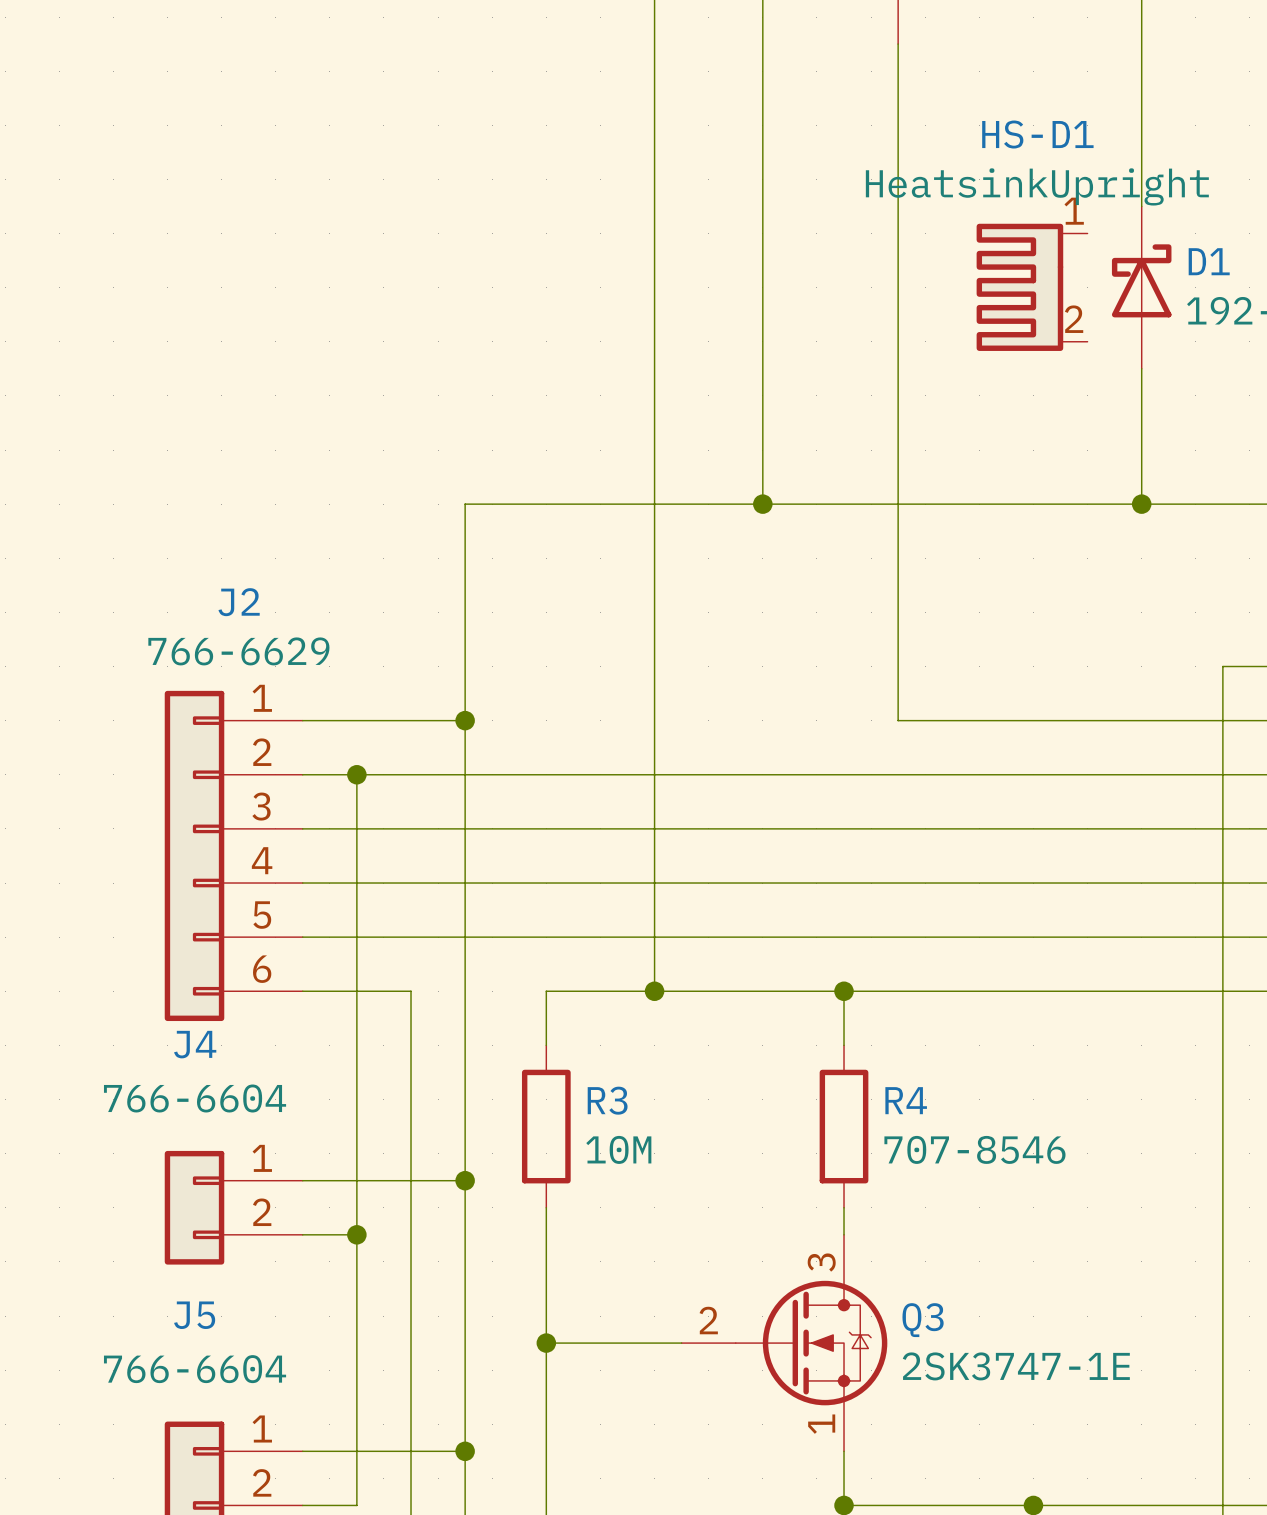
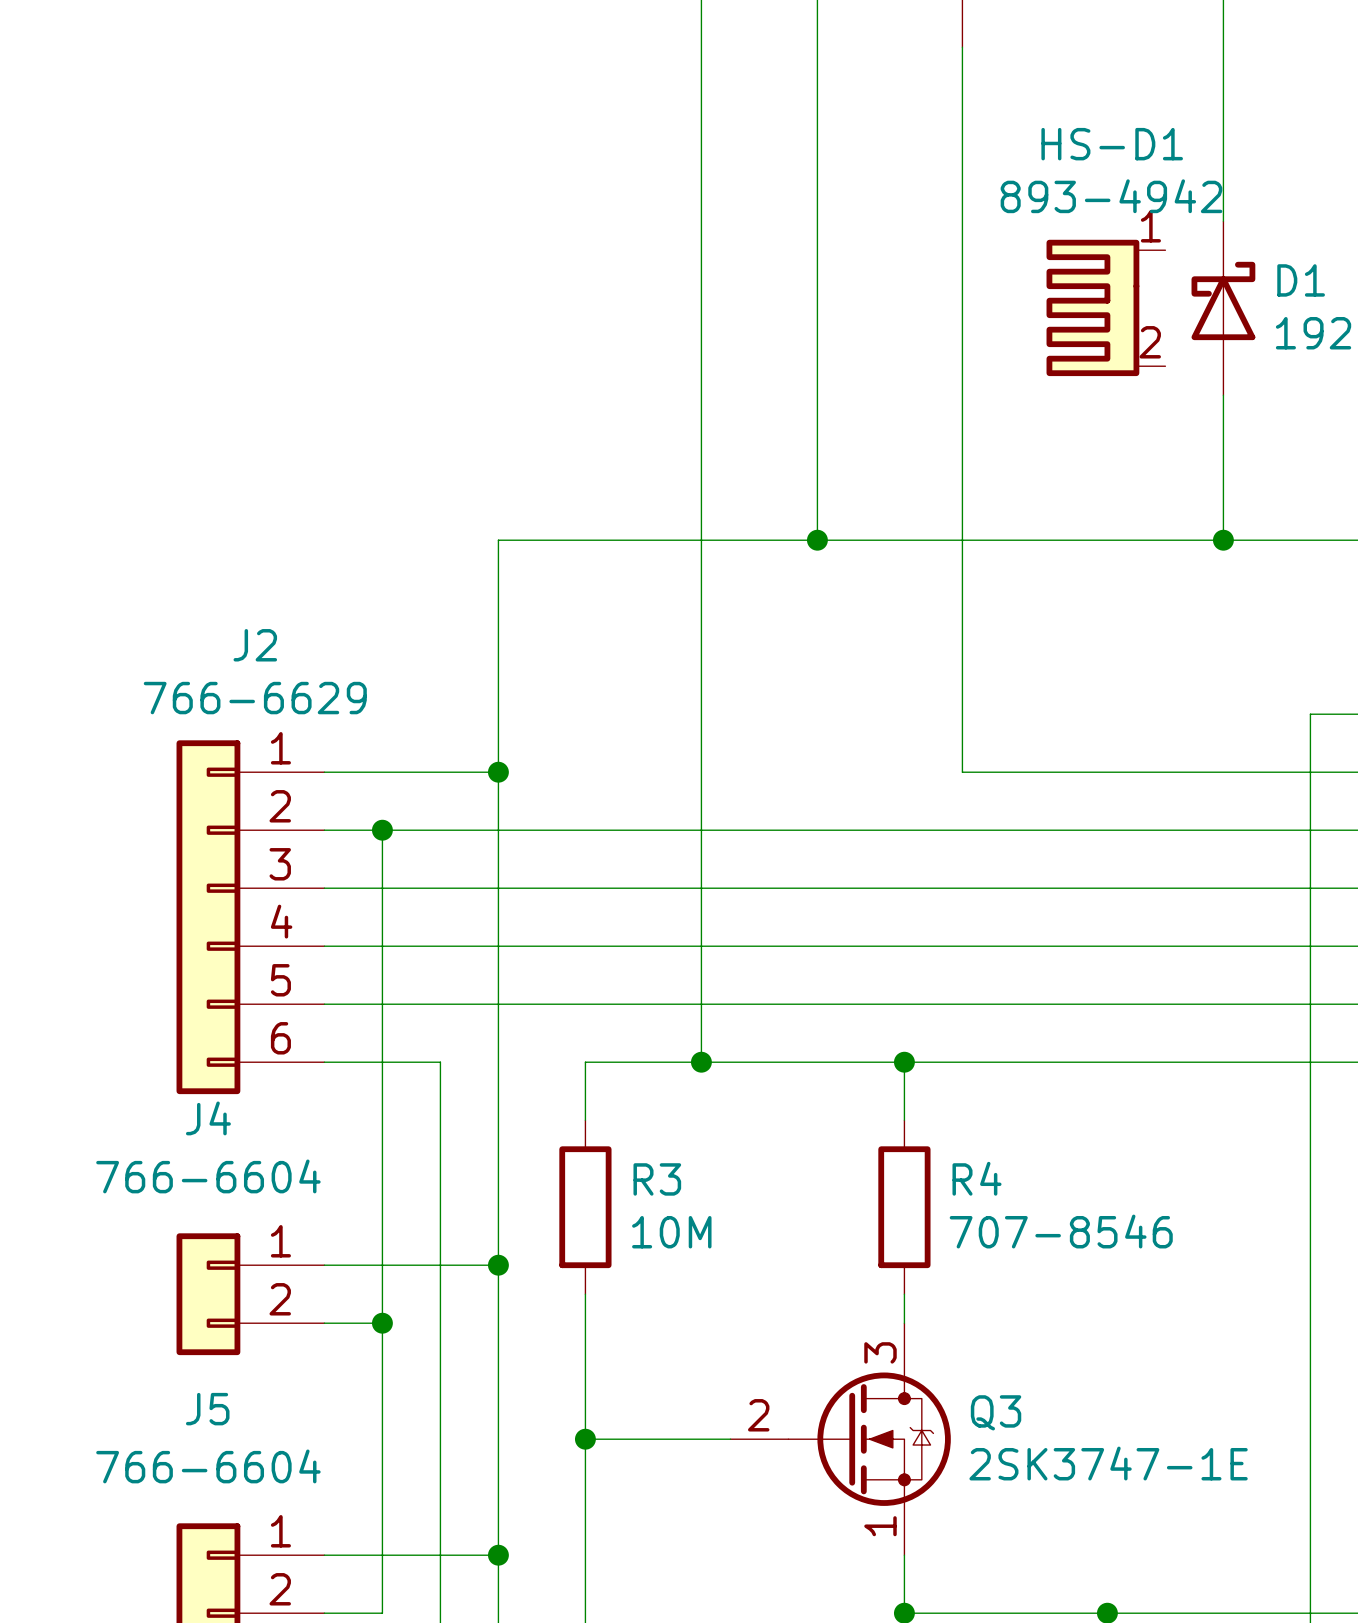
HS-D1 value: HeatsinkUpright (1037, 186) -> 893-4942 (1111, 196)

